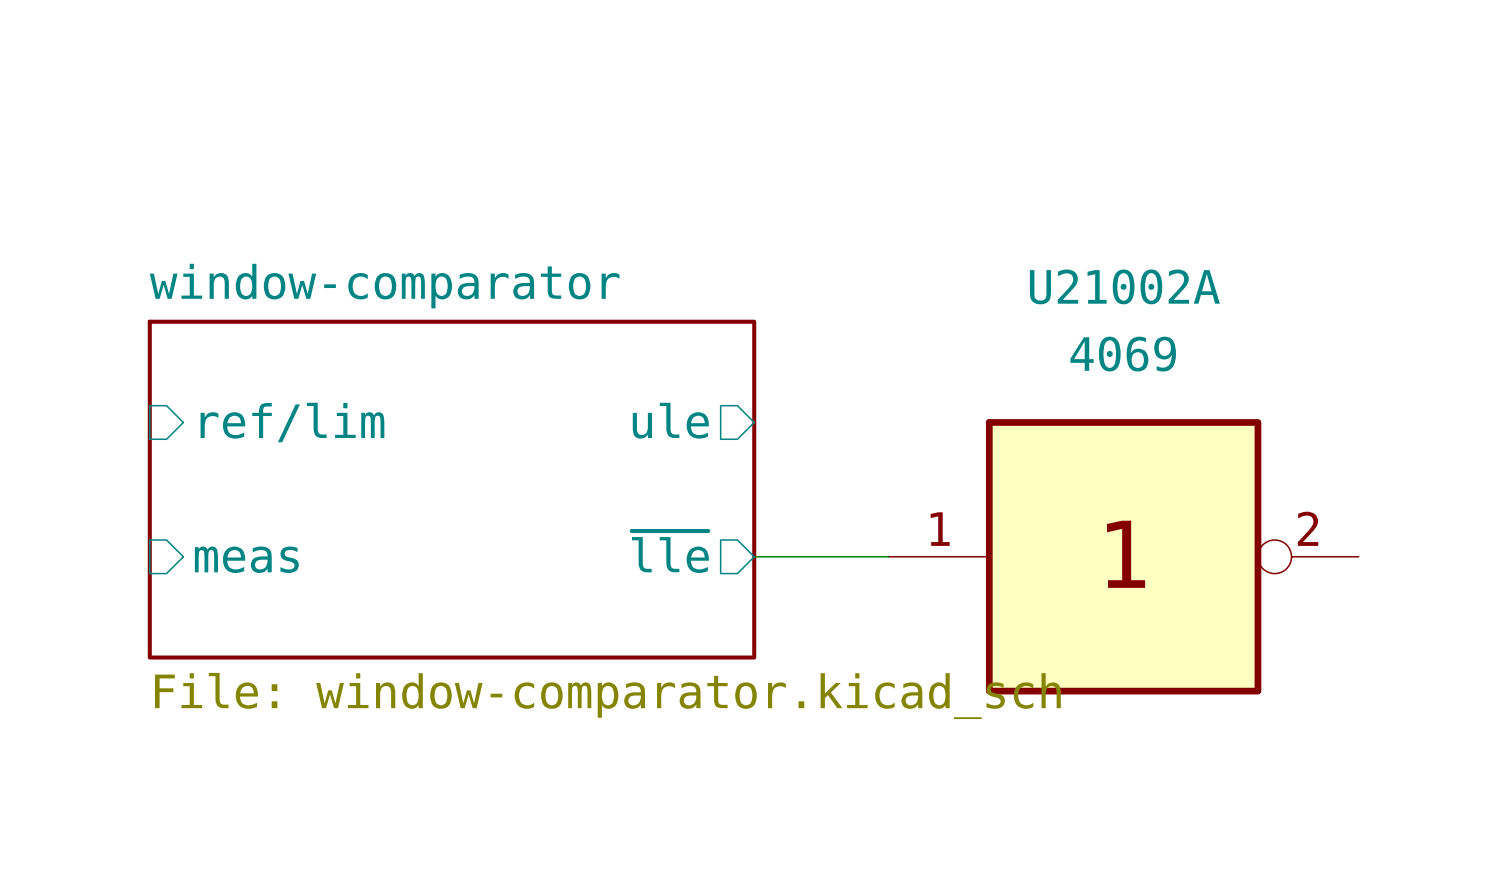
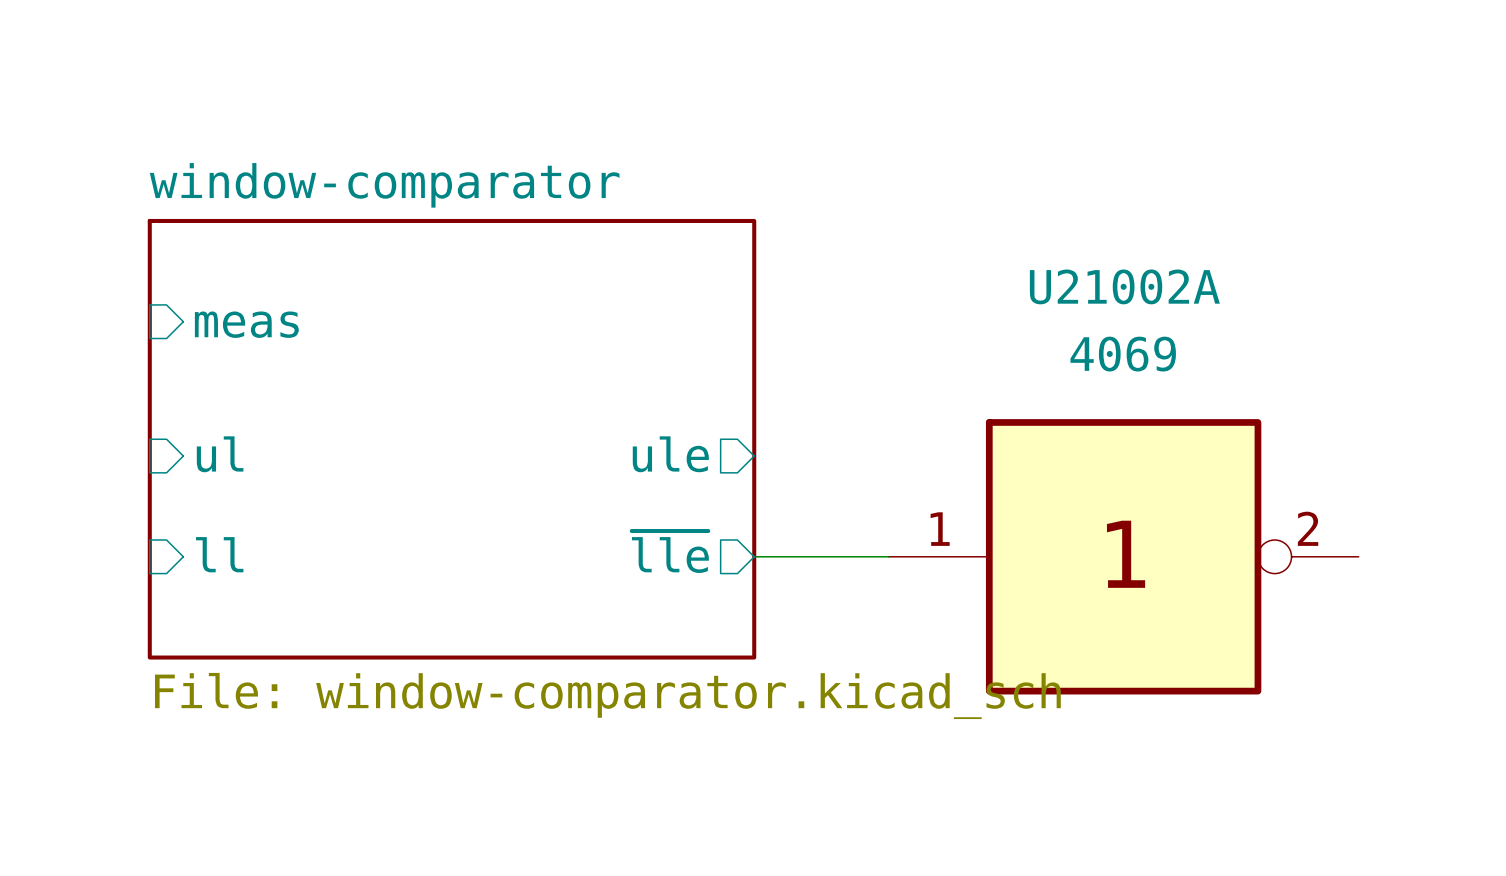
sheet pin: none -> meas (246, 324)
sheet pin position: ule (670, 420) -> ule (670, 454)
sheet pin: ref/lim (292, 422) -> none
sheet window-comparator: none -> File: window-comparator.kicad_sch (452, 439)
sheet pin: none -> ul (220, 454)
sheet window-comparator: File: window-comparator.kicad_sch (452, 489) -> none
sheet pin: meas (246, 559) -> ll (219, 554)

